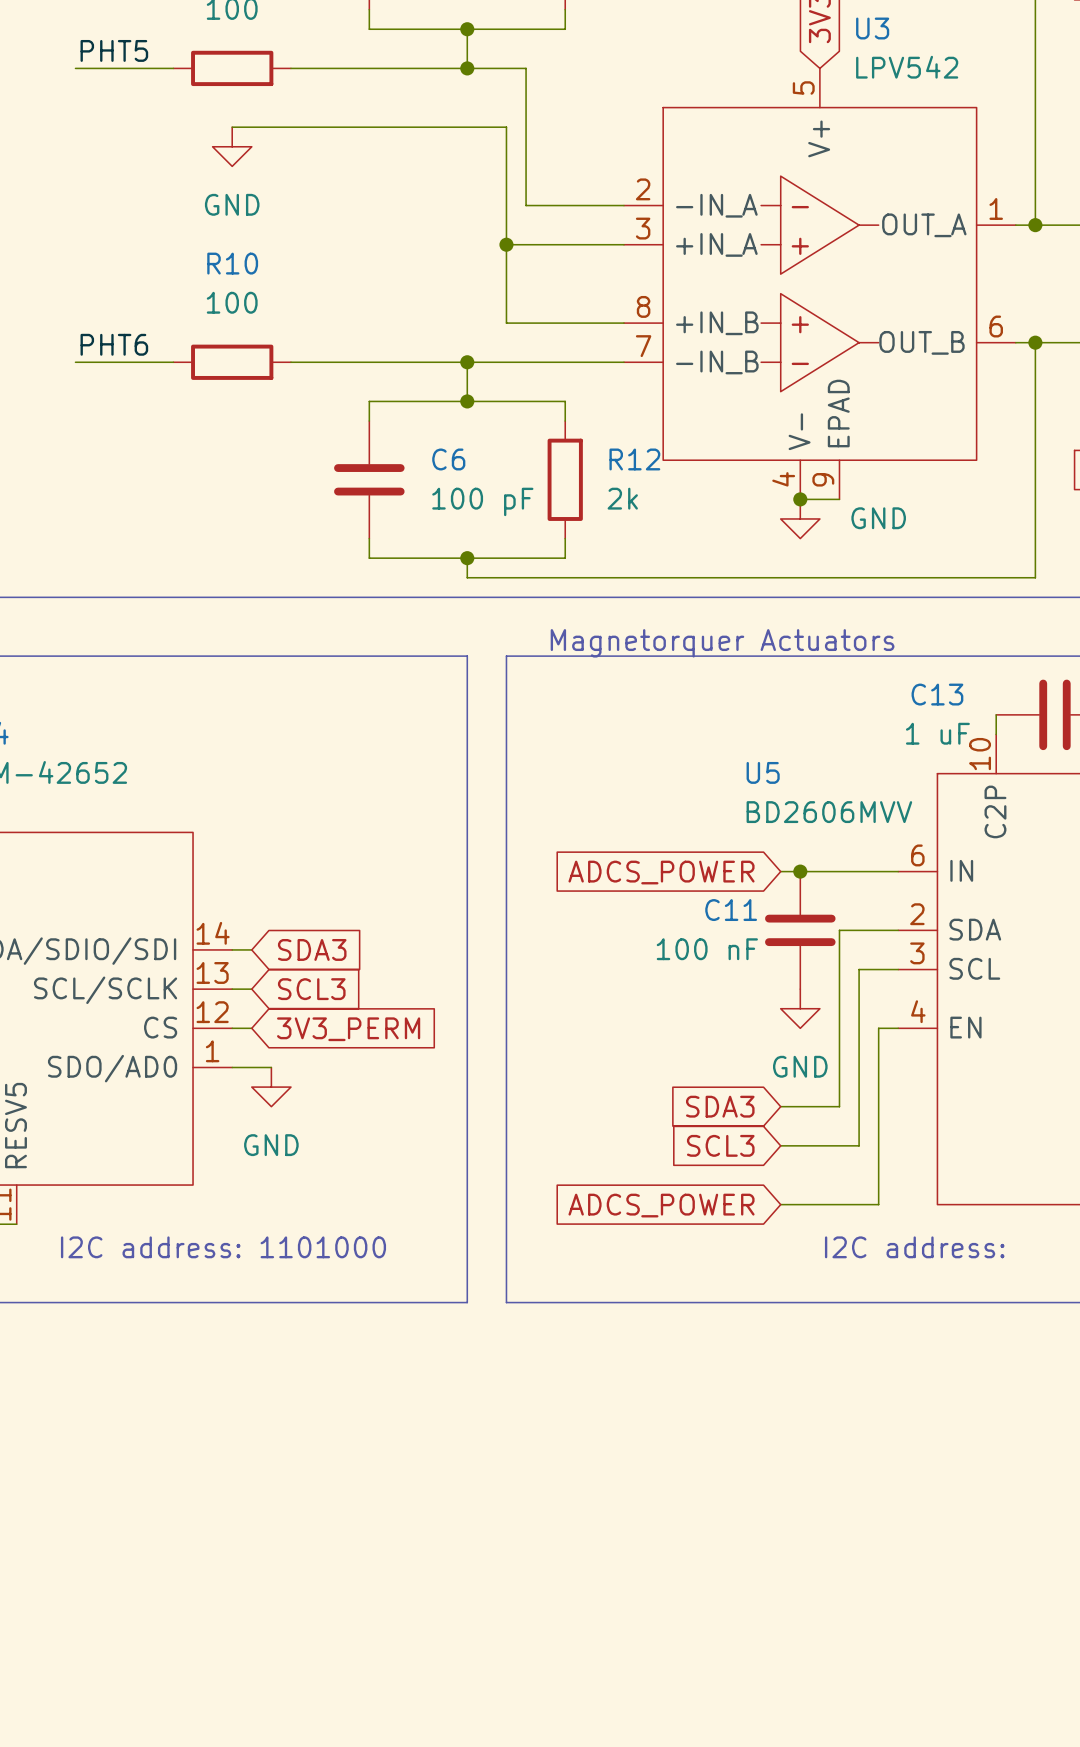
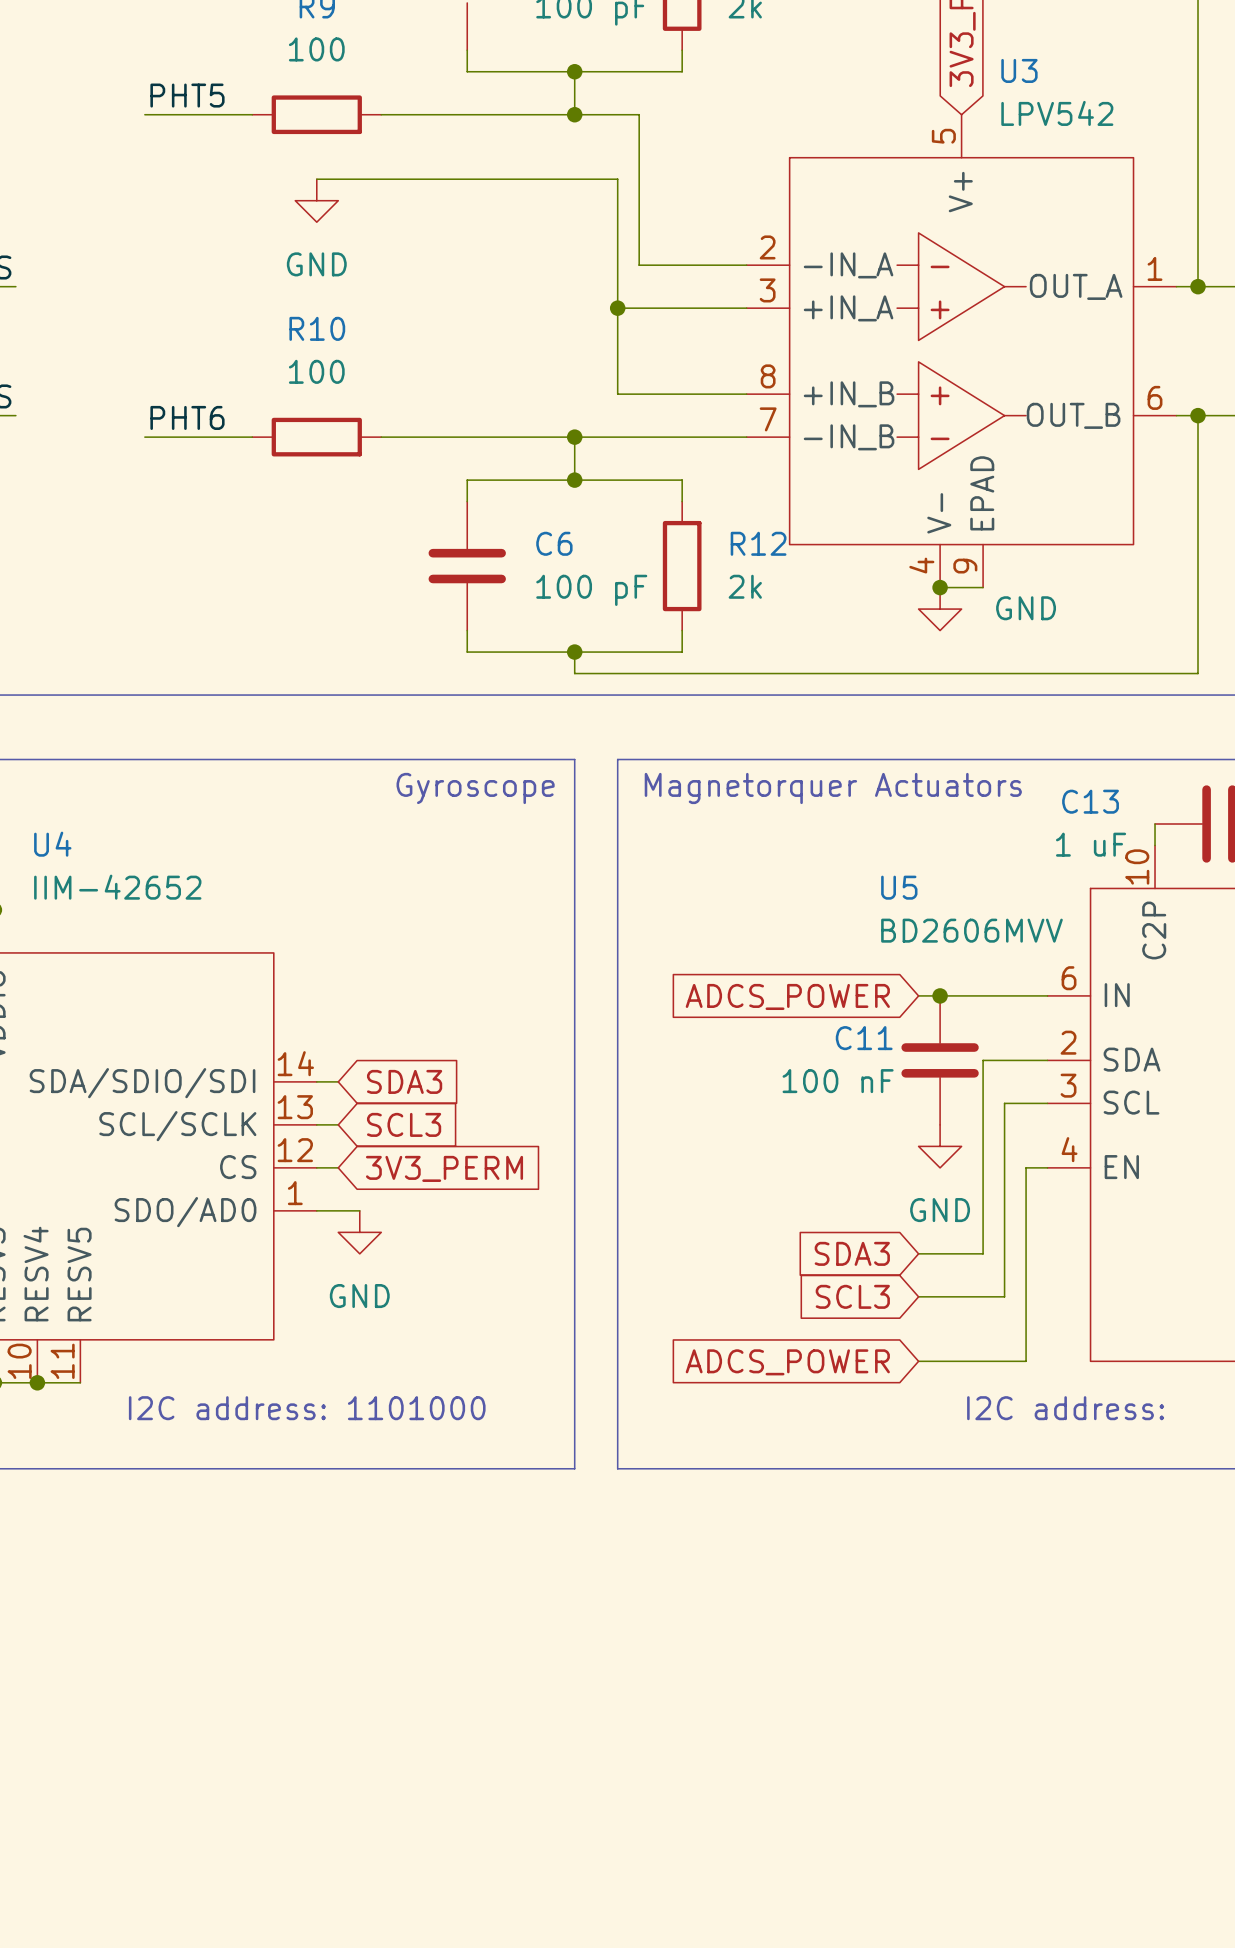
text position: Magnetorquer Actuators (722, 643) -> Magnetorquer Actuators (833, 788)
text: none -> Gyroscope (475, 788)

